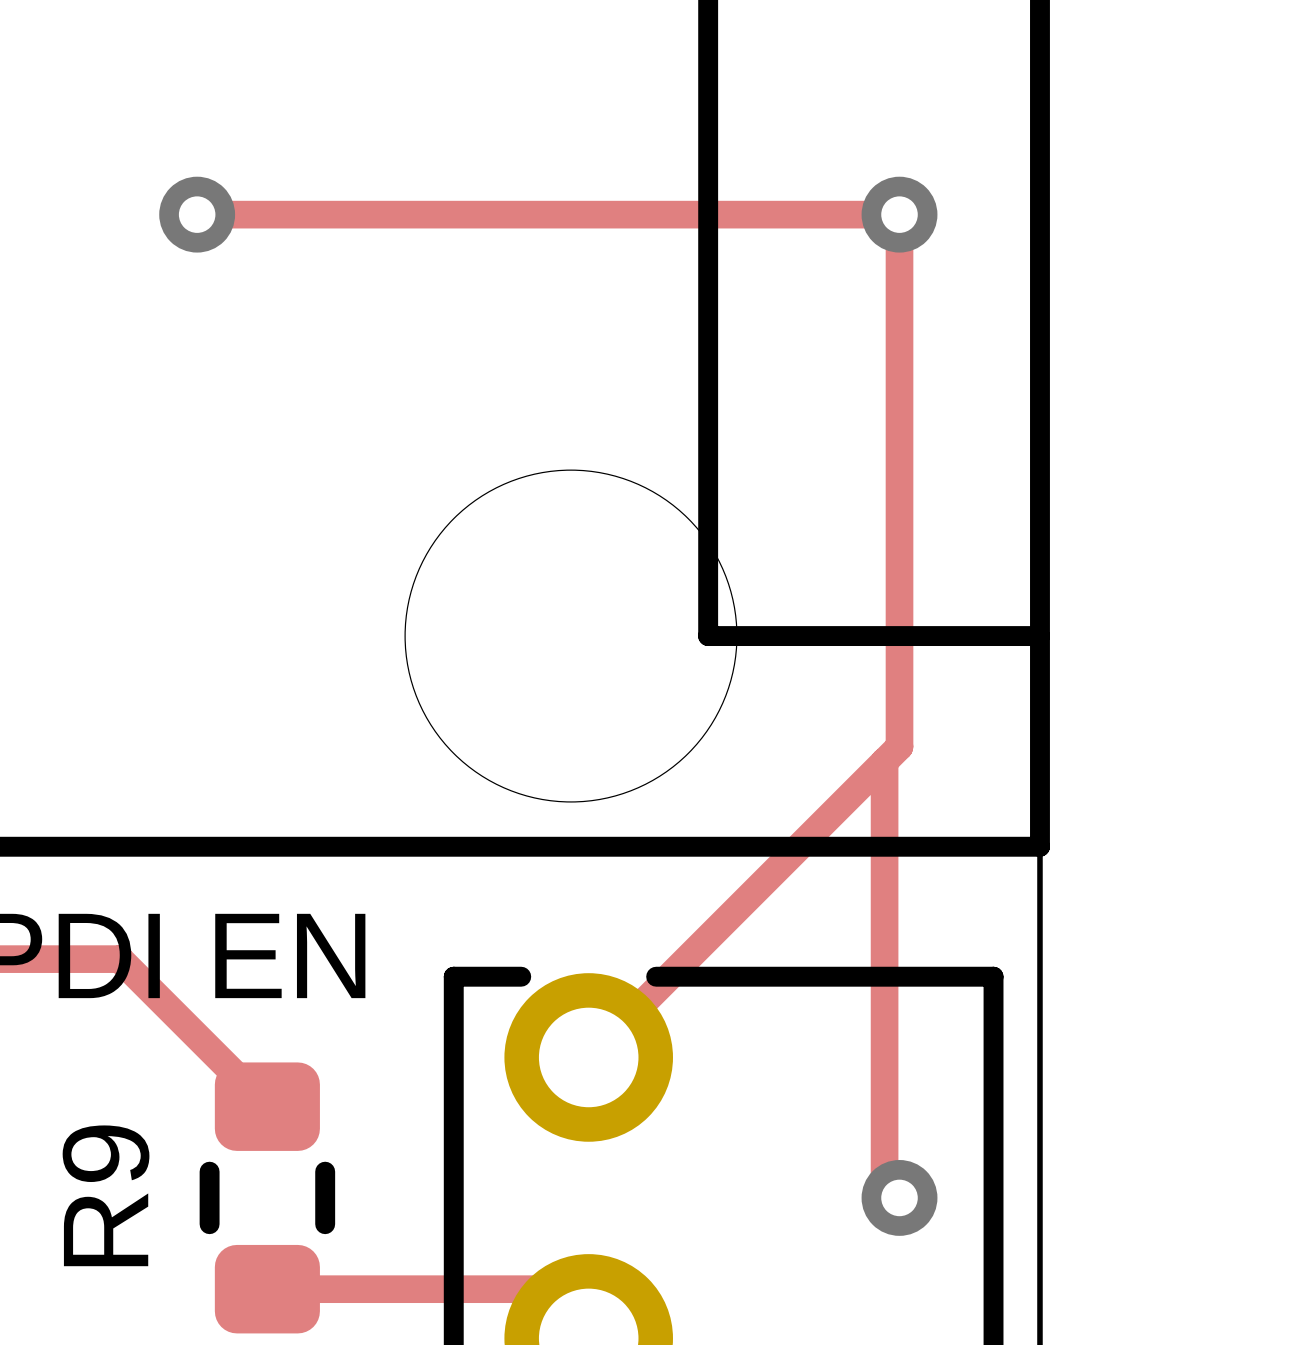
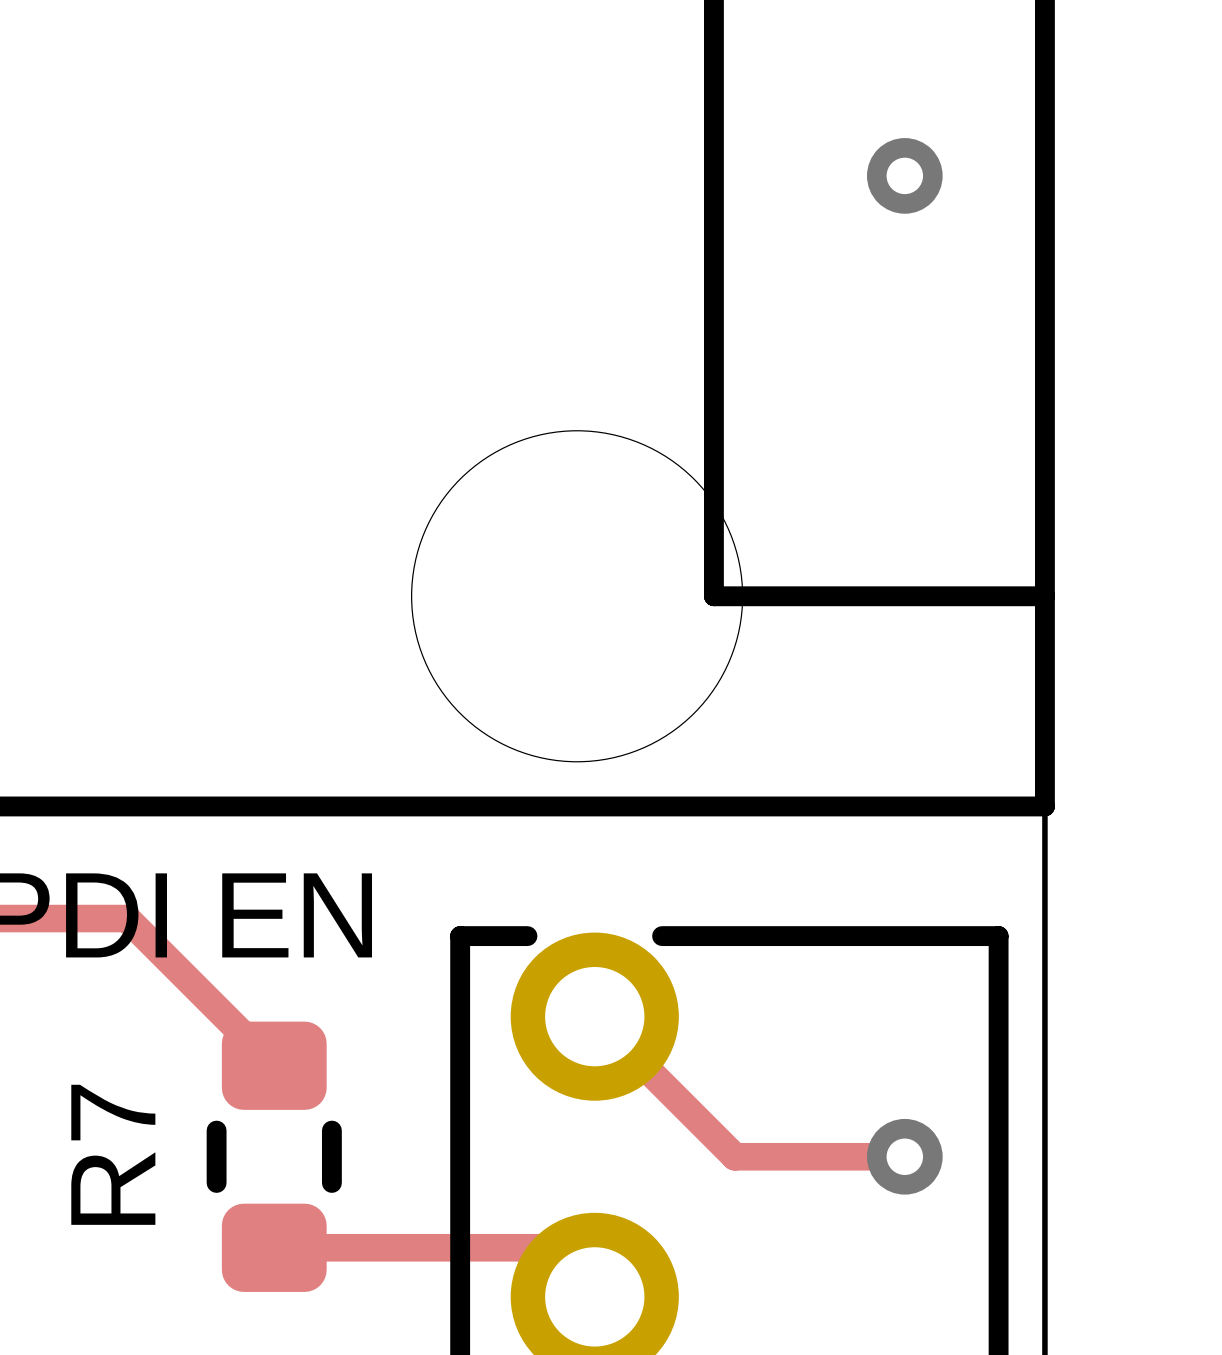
track: (197, 214) (899, 214) (899, 746) (588, 1057) -> (914, 1146) (904, 1156) (734, 1156) (594, 1016)
via: (197, 214) -> none
track: (884, 761) (884, 1183) (899, 1197) -> none
R9 name: R9 (106, 1195) -> R7 (113, 1154)

